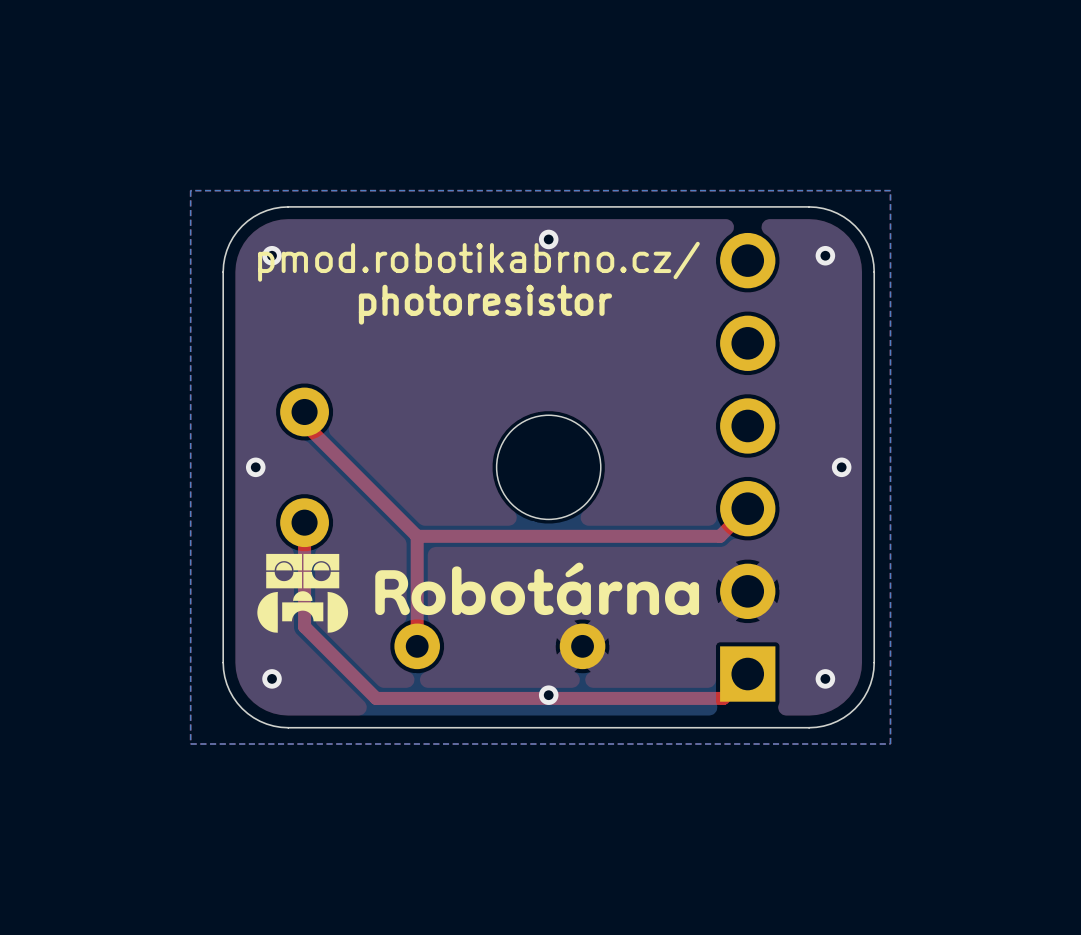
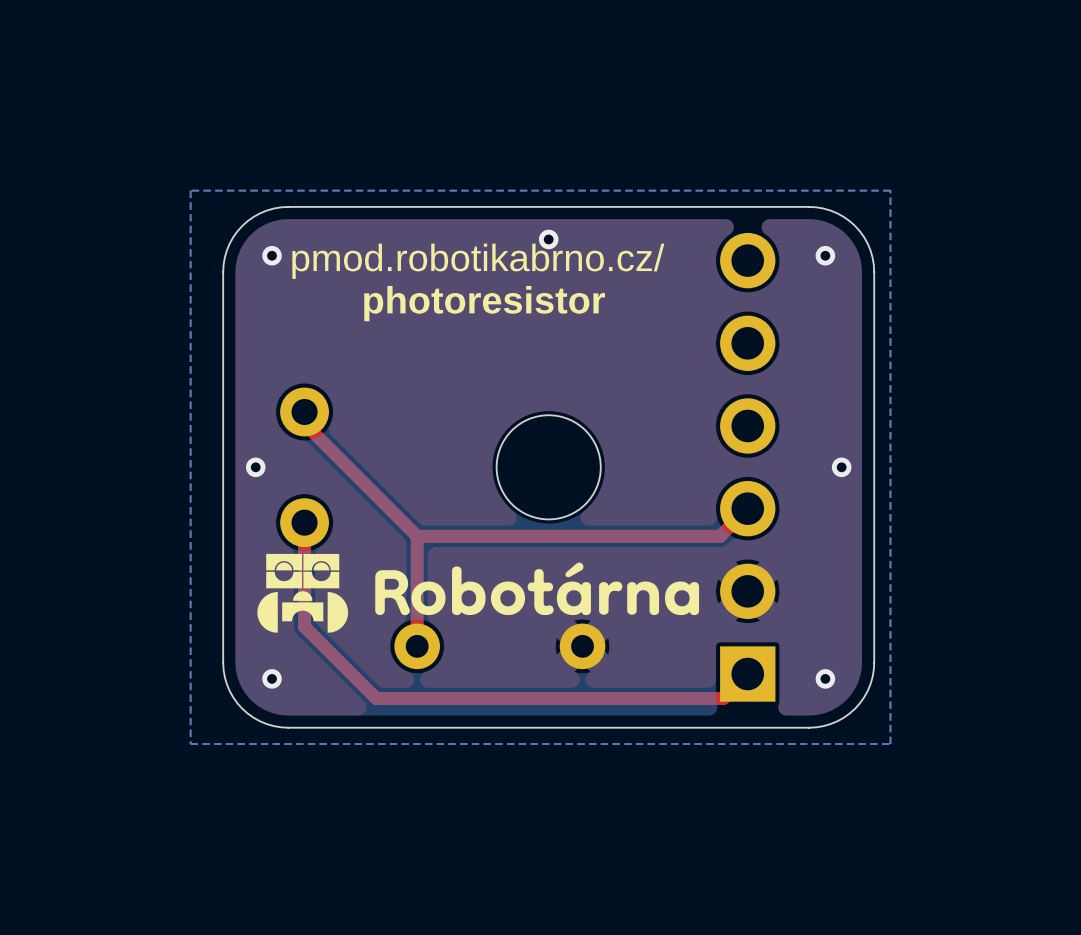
via: (548, 695) -> none

